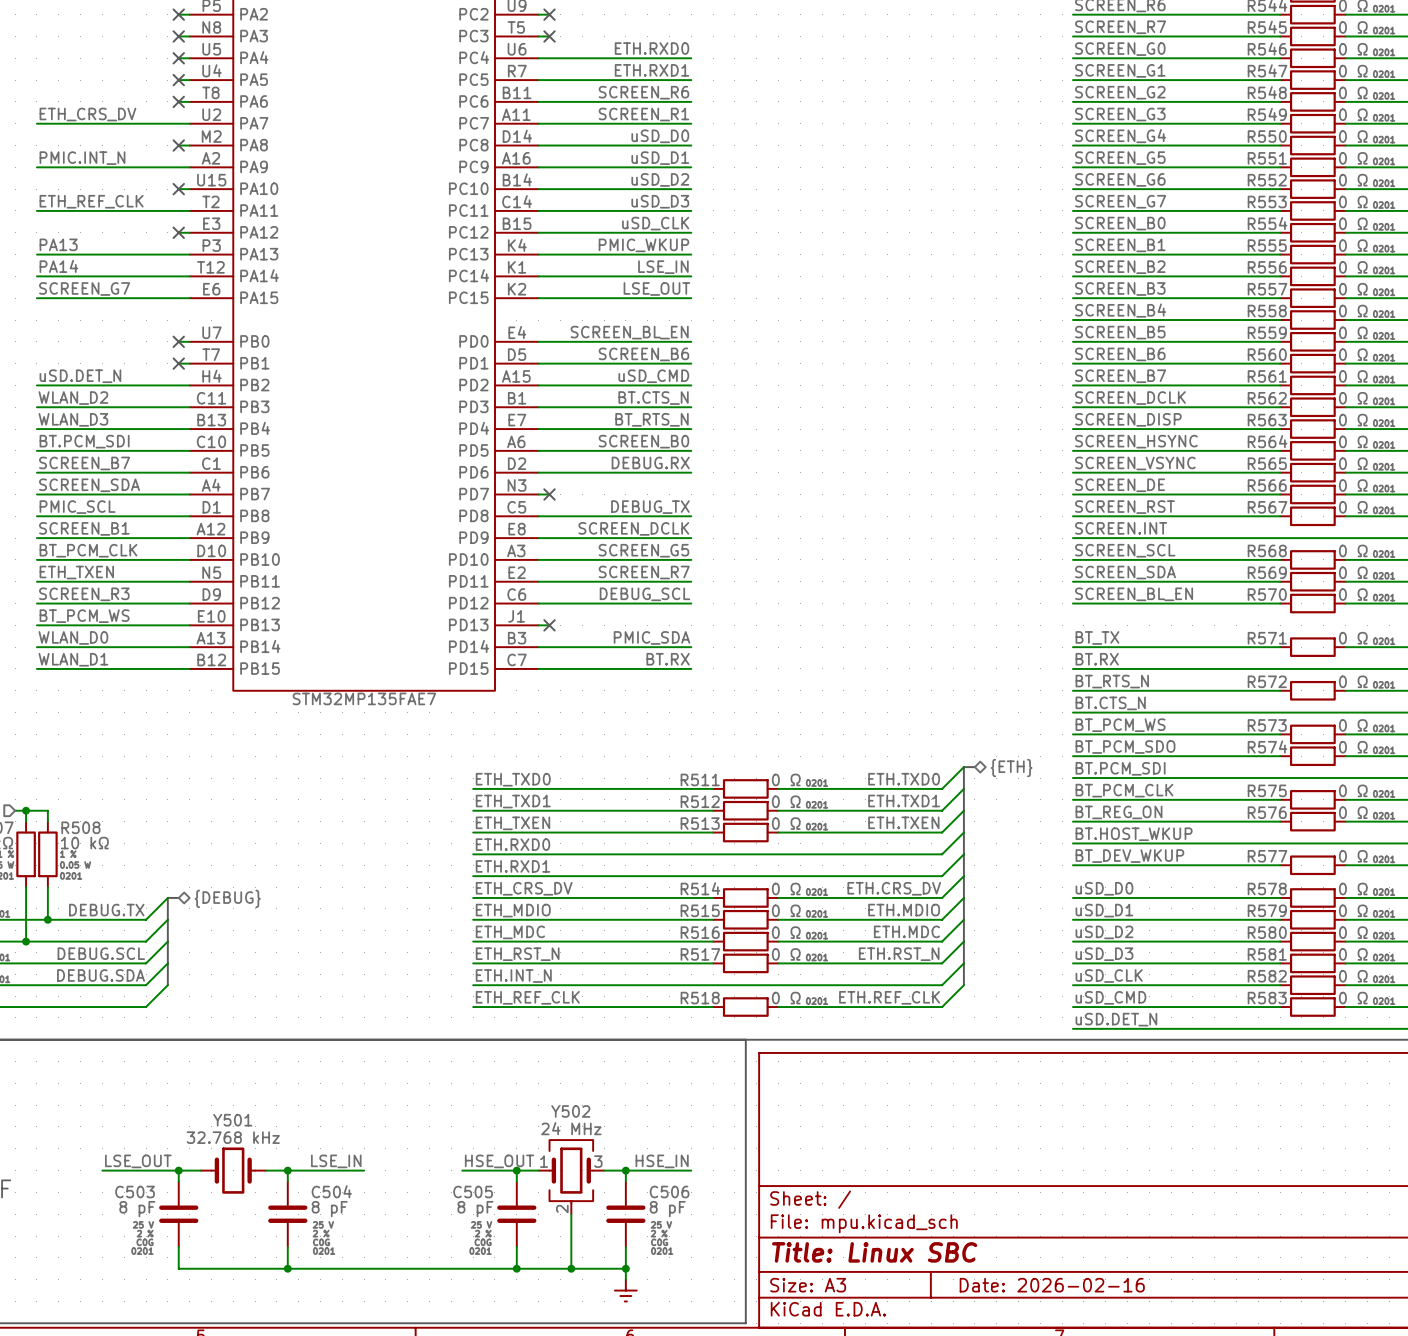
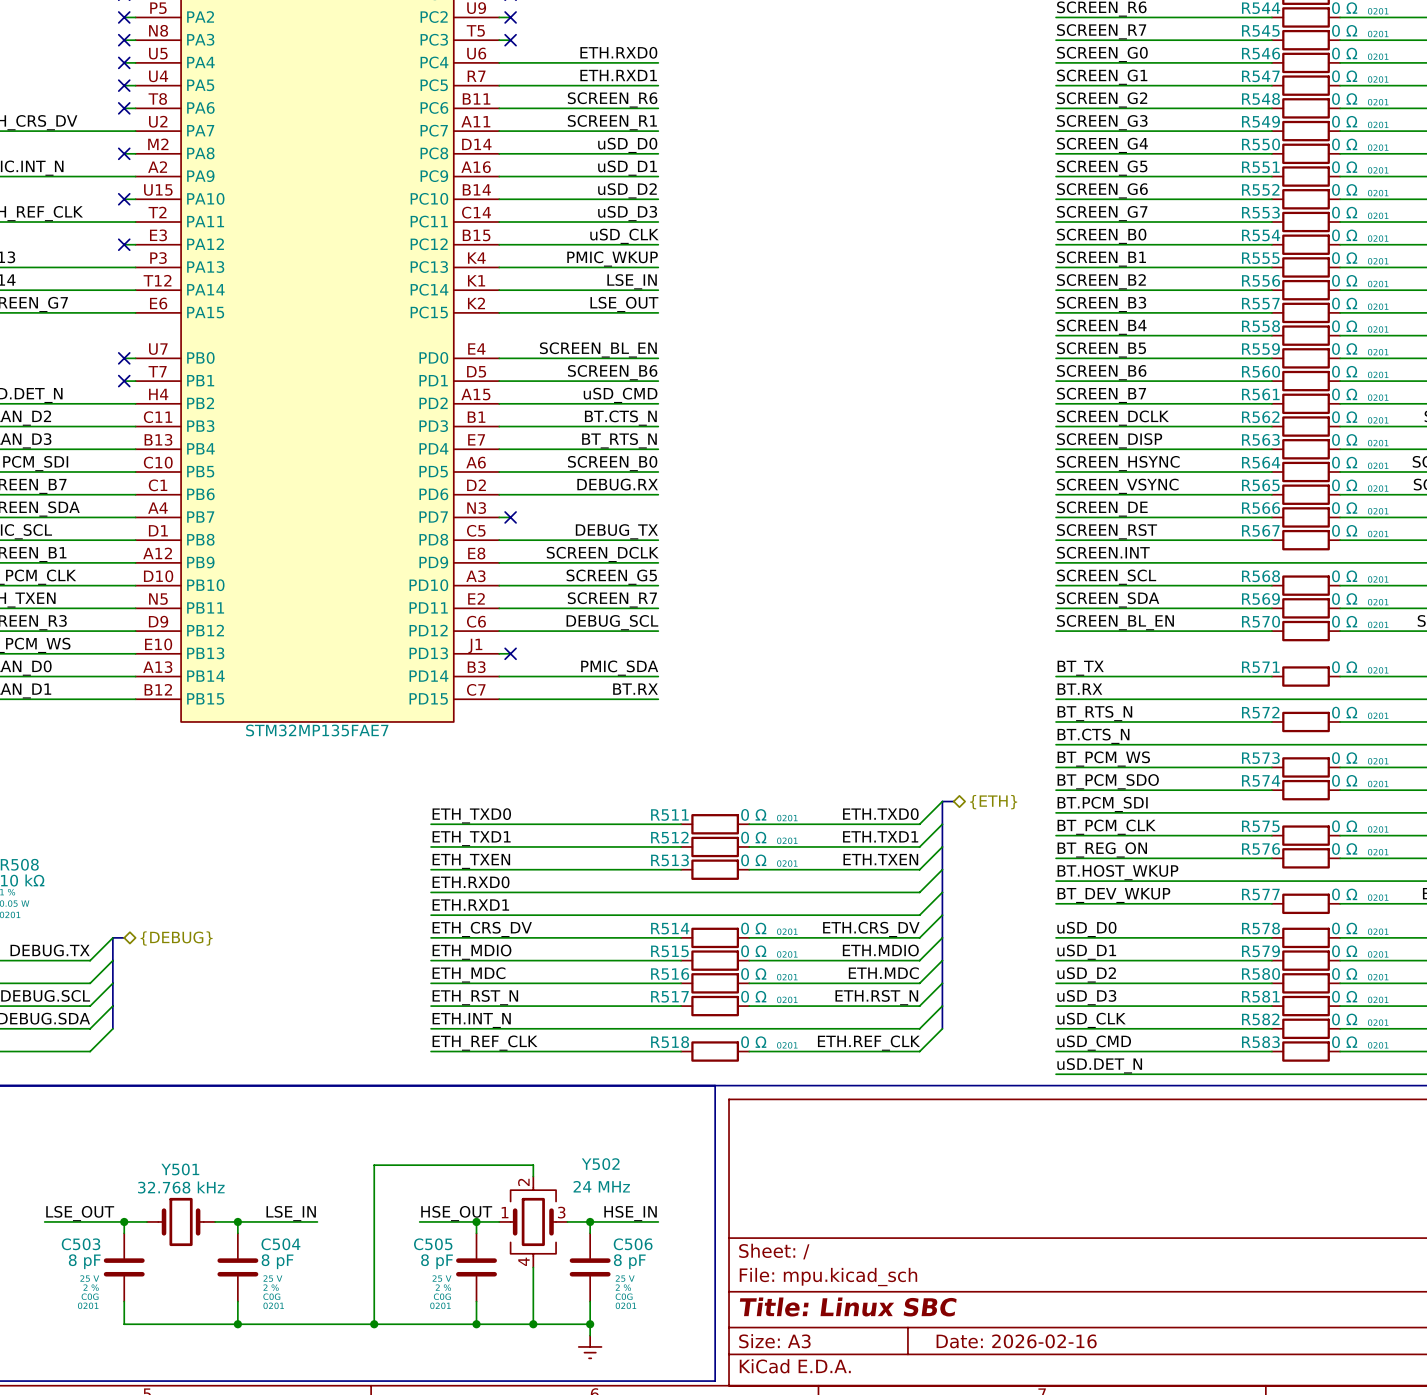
Y502 name position: Y502 (570, 1111) -> Y502 (600, 1164)
wire: none -> (533, 1176) (533, 1165) (374, 1165) (374, 1324)
Y502 value position: 24 MHz (571, 1128) -> 24 MHz (601, 1186)
Y502 symbol: [538, 1140, 605, 1215] -> [499, 1176, 568, 1268]
junction: none -> (374, 1324)

